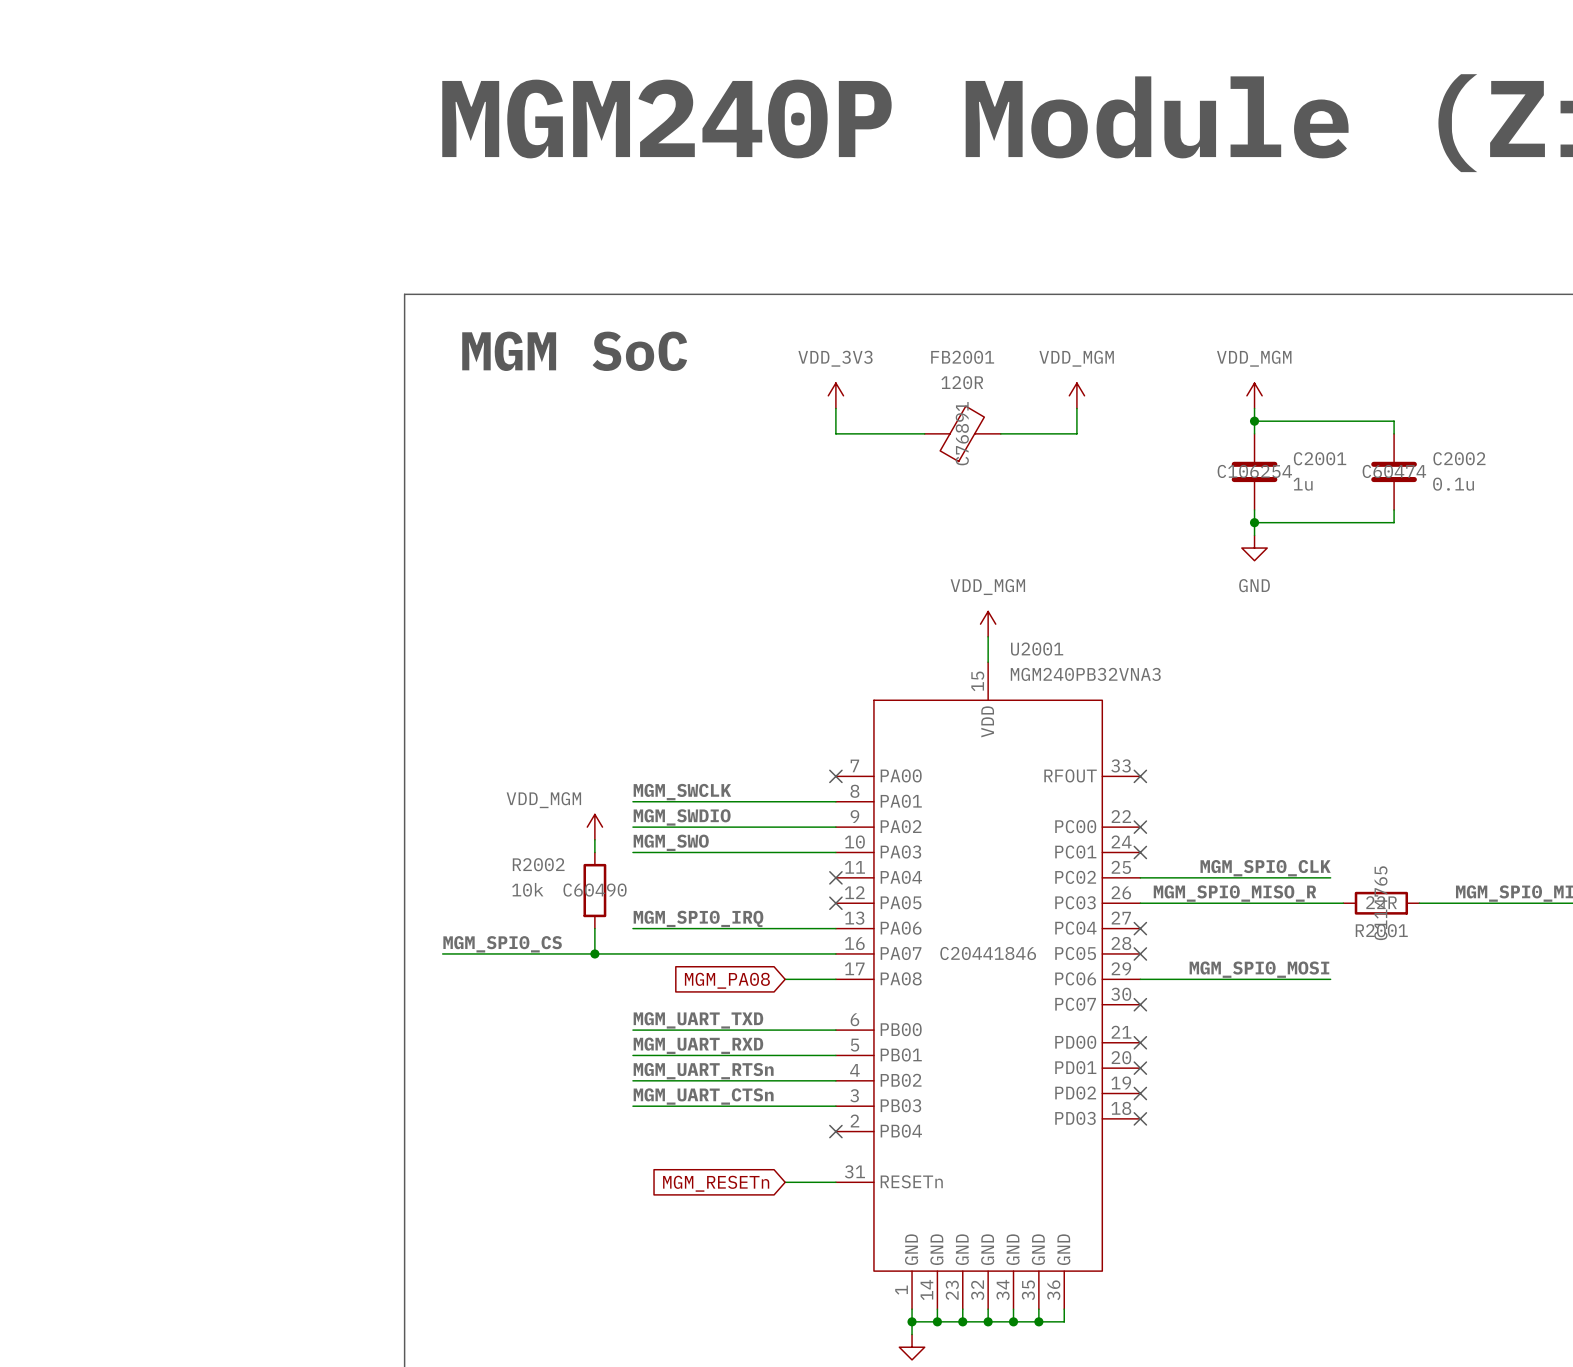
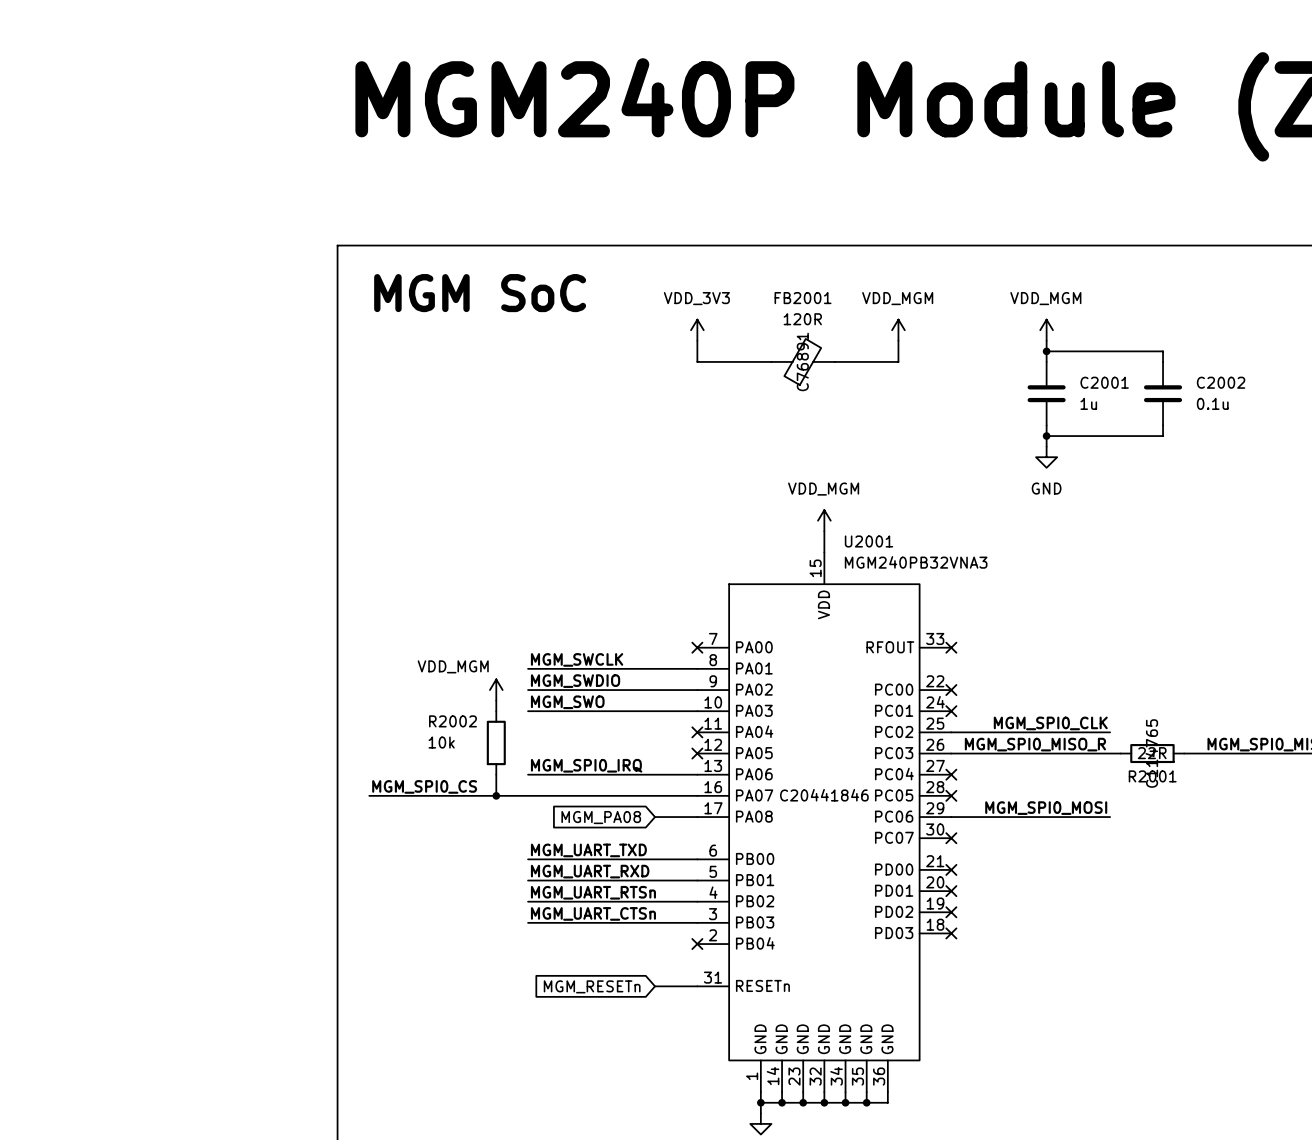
C2001 text: C106254 (1254, 471) -> none
C2002 text: C60474 (1394, 471) -> none
R2002 text: C60490 (595, 890) -> none

